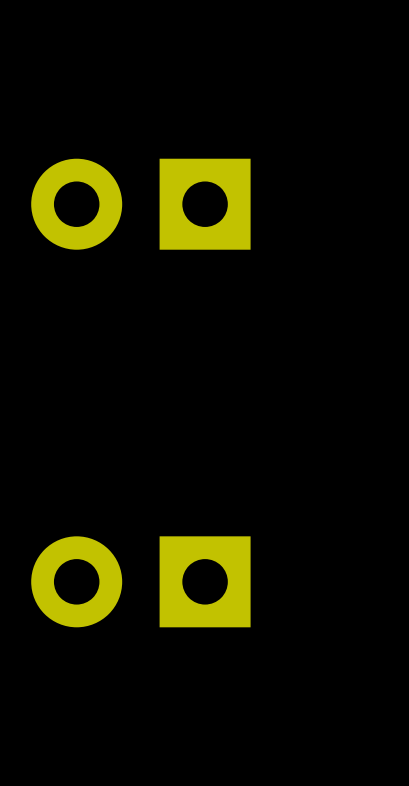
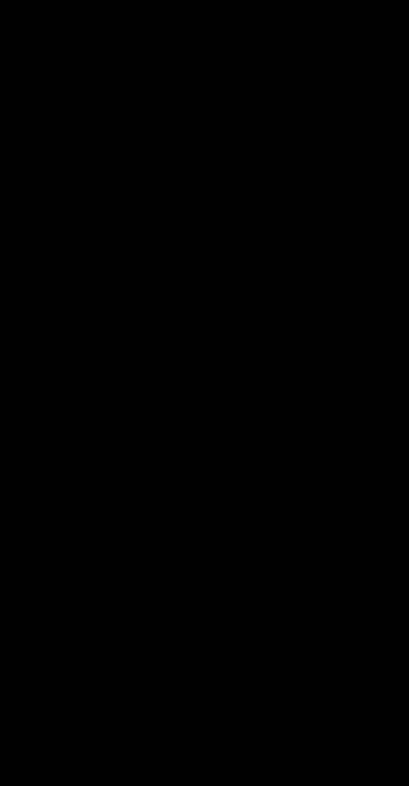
part: (140, 204) -> none
part: (140, 581) -> none

